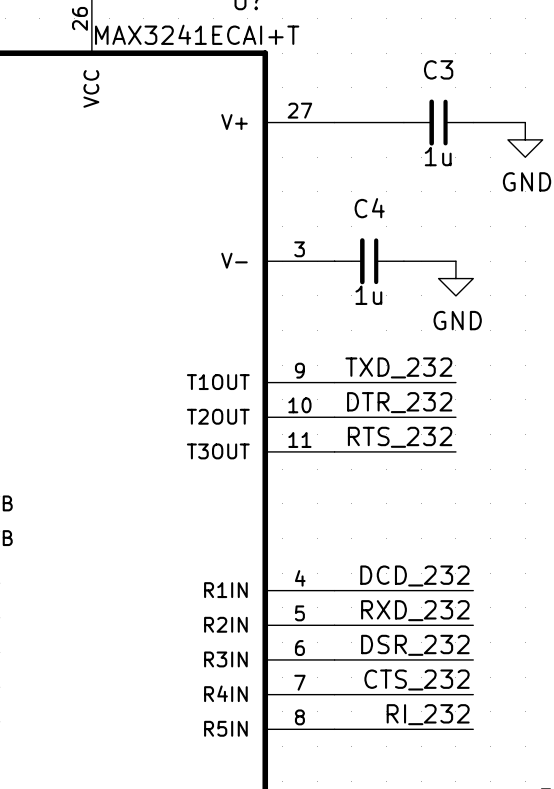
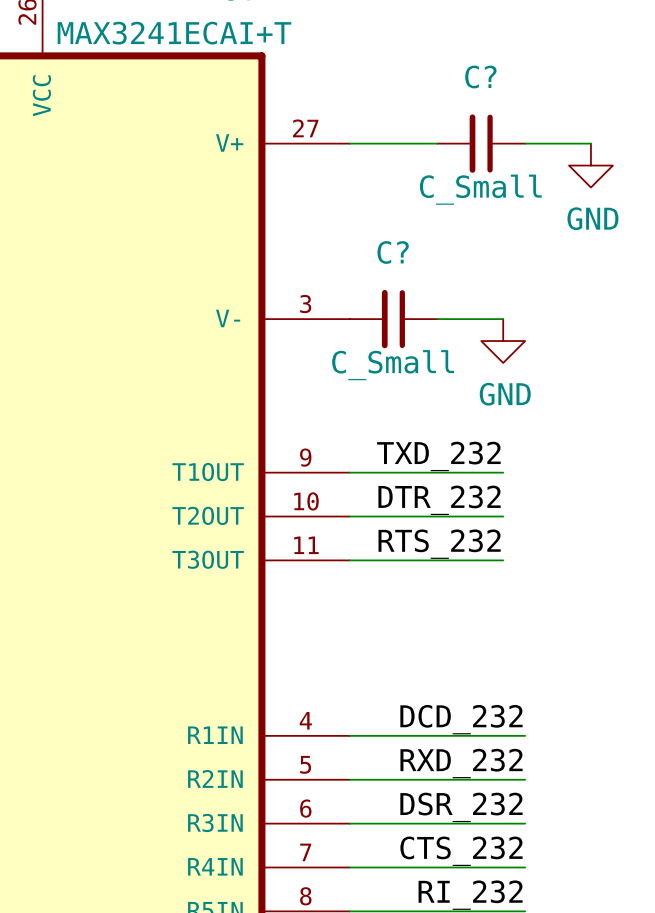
C3 name: C3 (438, 69) -> C? (480, 77)
C3 value: 1u (438, 156) -> C_Small (480, 189)
C4 name: C4 (369, 208) -> C? (393, 252)
C4 value: 1u (368, 295) -> C_Small (393, 365)

